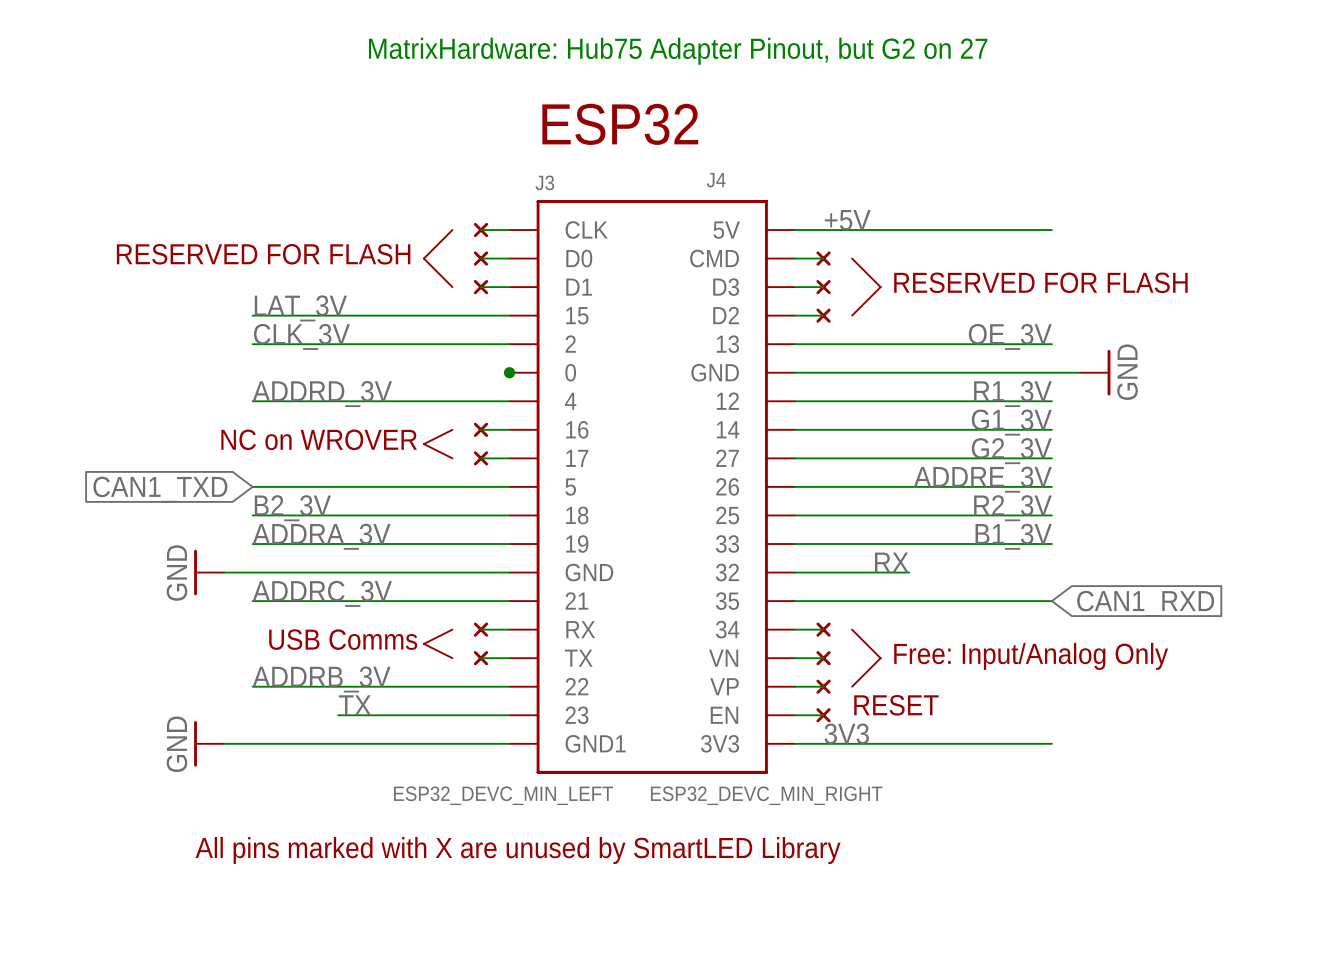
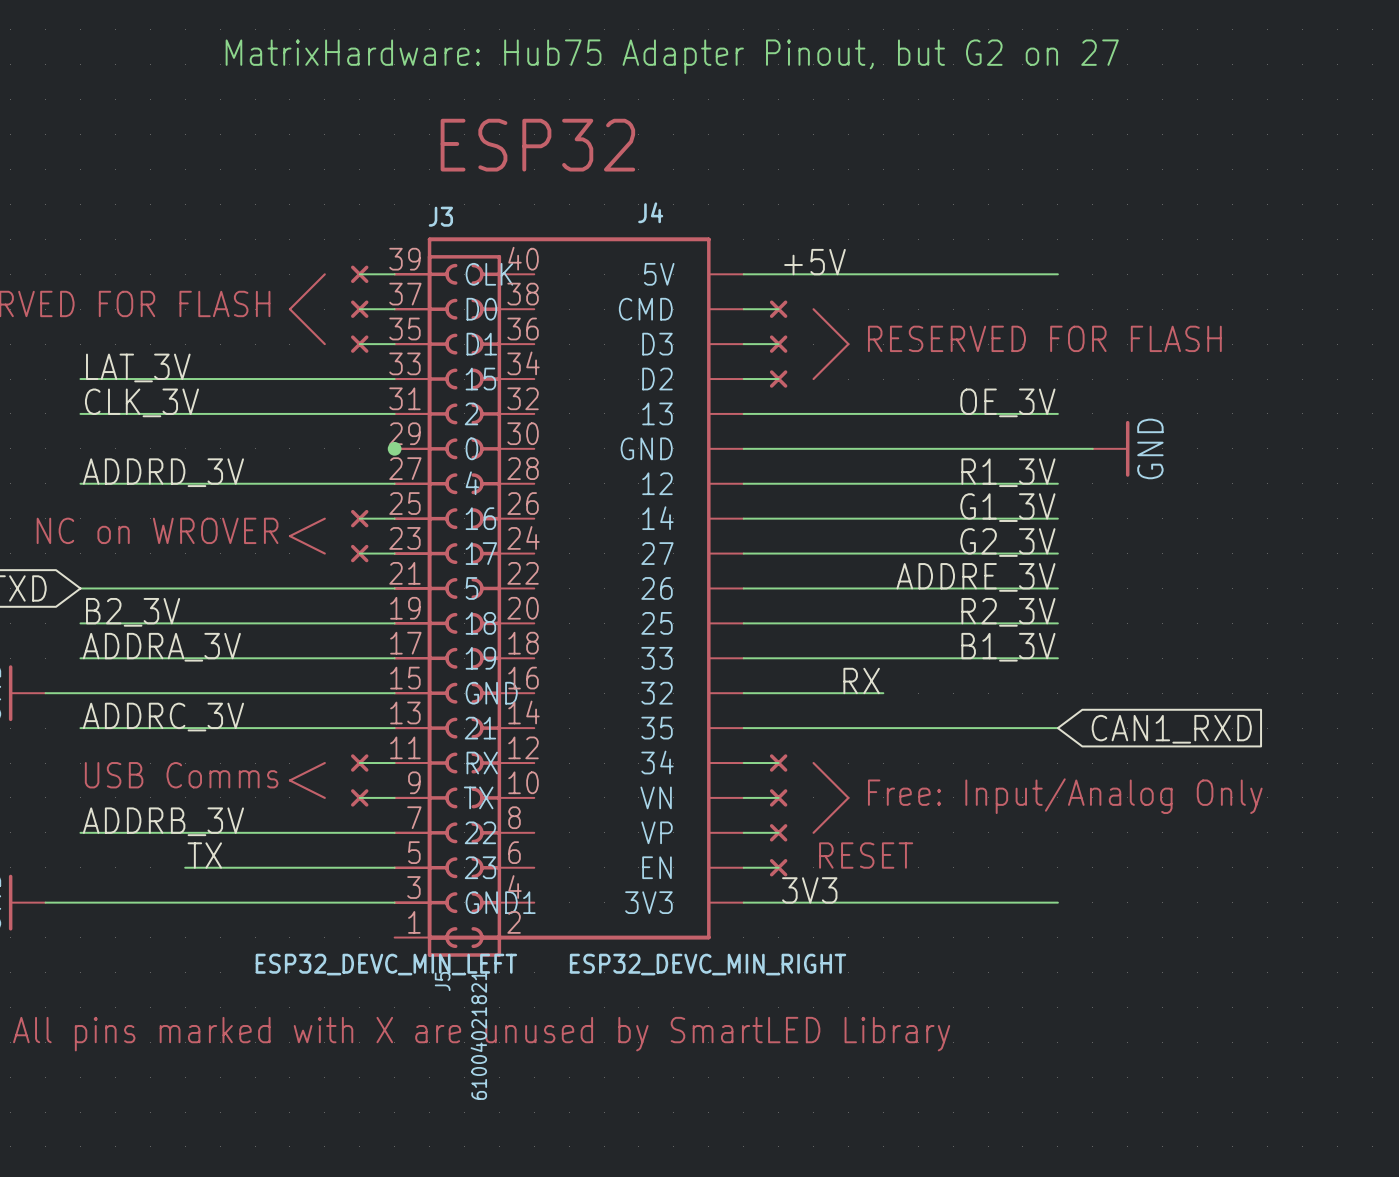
J5: none -> 61004021821 (464, 605)

